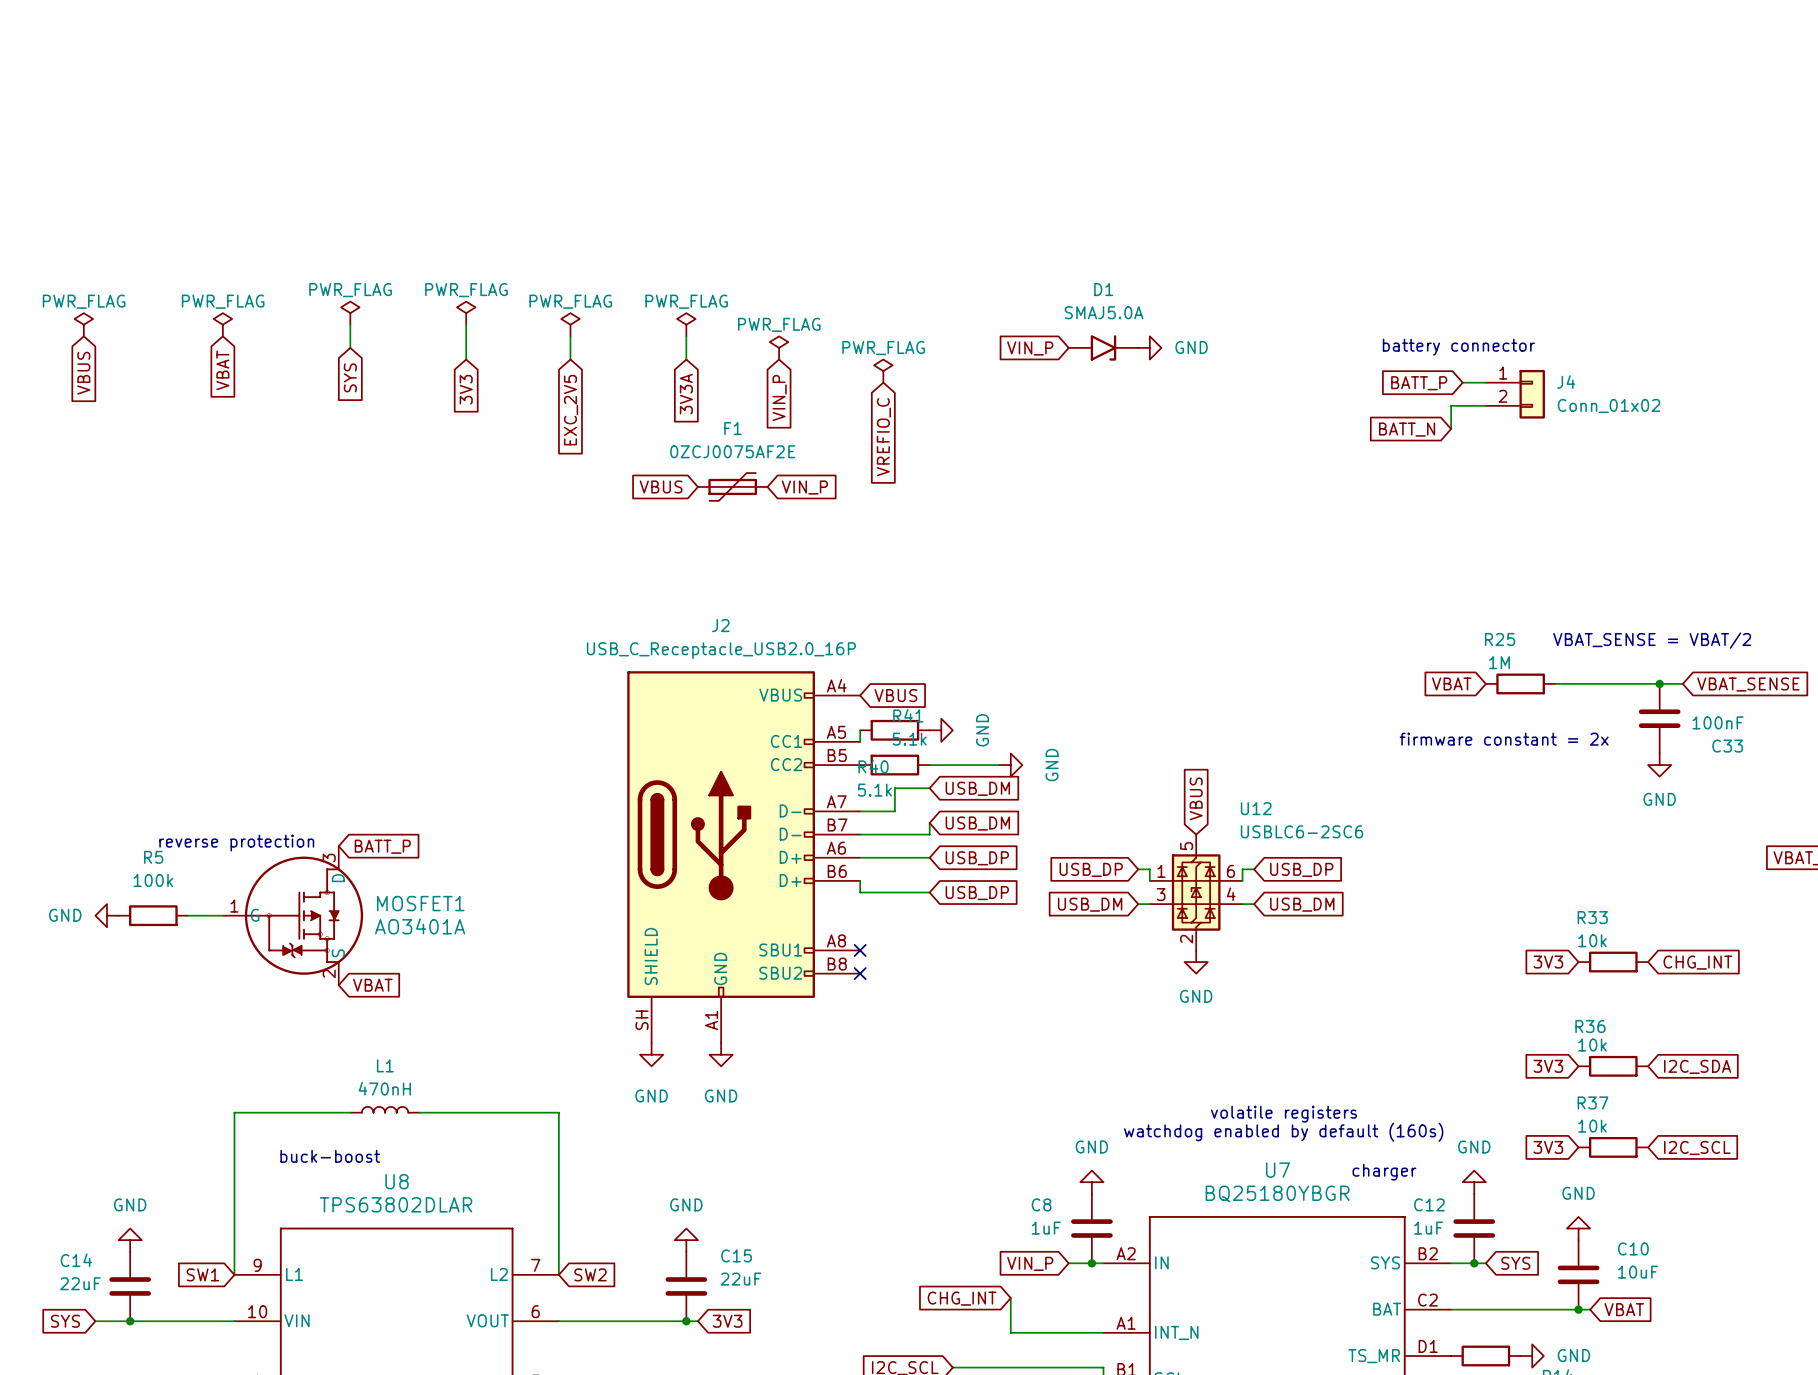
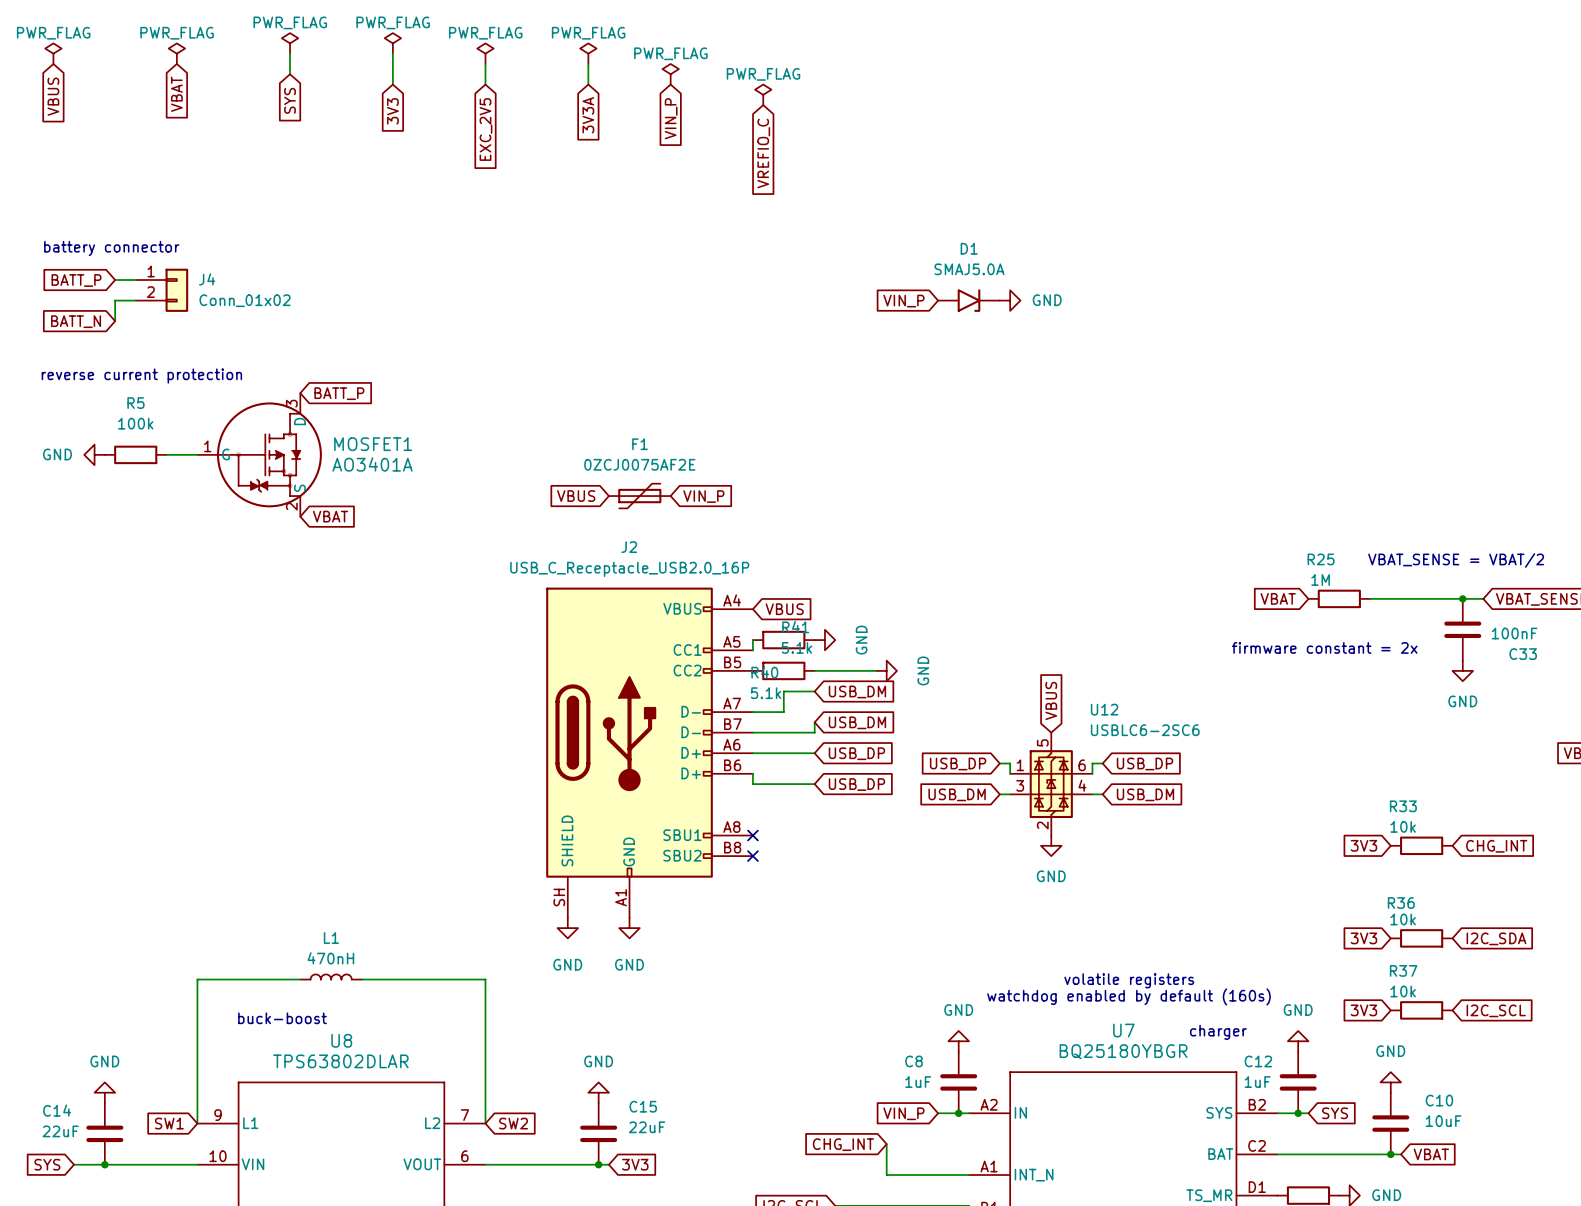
power symbol: none -> PWR_FLAG (290, 43)
power symbol: none -> PWR_FLAG (392, 43)
power symbol: none -> PWR_FLAG (53, 53)
power symbol: none -> PWR_FLAG (176, 53)
wire: none -> (290, 53) (290, 74)
wire: none -> (392, 53) (392, 84)
power symbol: none -> PWR_FLAG (485, 53)
power symbol: none -> PWR_FLAG (588, 53)
wire: none -> (485, 63) (485, 84)
wire: none -> (588, 63) (588, 84)
power symbol: none -> PWR_FLAG (670, 74)
global label: none -> VBAT (176, 94)
power symbol: none -> PWR_FLAG (763, 94)
global label: none -> VBUS (53, 96)
global label: none -> SYS (290, 100)
global label: none -> 3V3 (392, 111)
global label: none -> 3V3A (588, 115)
global label: none -> VIN_P (671, 118)
global label: none -> EXC_2V5 (485, 129)
global label: none -> VREFIO_C (763, 153)
text: none -> battery connector (111, 248)
power symbol: PWR_FLAG (350, 313) -> none
power symbol: PWR_FLAG (466, 313) -> none
power symbol: PWR_FLAG (83, 324) -> none
wire: none -> (115, 280) (135, 280)
power symbol: PWR_FLAG (222, 324) -> none
wire: (350, 324) (350, 347) -> none
wire: (466, 324) (466, 359) -> none
power symbol: PWR_FLAG (570, 324) -> none
power symbol: PWR_FLAG (686, 324) -> none
global label: none -> BATT_P (76, 280)
wire: (570, 336) (570, 359) -> none
wire: (686, 336) (686, 359) -> none
wire: none -> (135, 300) (115, 300) (115, 321)
power symbol: PWR_FLAG (779, 347) -> none
text: battery connector (1458, 347) -> none
global label: VBAT (222, 370) -> none
global label: none -> BATT_N (76, 321)
power symbol: PWR_FLAG (883, 371) -> none
global label: VBUS (83, 373) -> none
global label: SYS (350, 377) -> none
wire: (1462, 382) (1485, 382) -> none
global label: BATT_P (1419, 383) -> none
global label: 3V3 (466, 389) -> none
global label: 3V3A (686, 394) -> none
J4 position: (1515, 394) -> (161, 290)
global label: VIN_P (779, 398) -> none
wire: (1485, 405) (1451, 405) (1451, 429) -> none
global label: EXC_2V5 (571, 410) -> none
global label: BATT_N (1407, 429) -> none
text: none -> reverse current protection (141, 376)
global label: VREFIO_C (883, 437) -> none
global label: none -> BATT_P (339, 393)
global label position: VBUS (661, 486) -> VBUS (576, 496)
F1 position: (732, 486) -> (639, 496)
global label position: VIN_P (804, 487) -> VIN_P (703, 496)
power symbol: none -> GND (94, 454)
wire: none -> (166, 454) (197, 454)
global label: none -> VBAT (330, 516)
text: reverse protection (236, 843) -> none
global label: BATT_P (382, 846) -> none
power symbol: GND (107, 915) -> none
R5 position: (153, 915) -> (135, 454)
wire: (188, 915) (222, 915) -> none
MOSFET1 position: (292, 915) -> (259, 454)
global label: VBAT (372, 985) -> none

